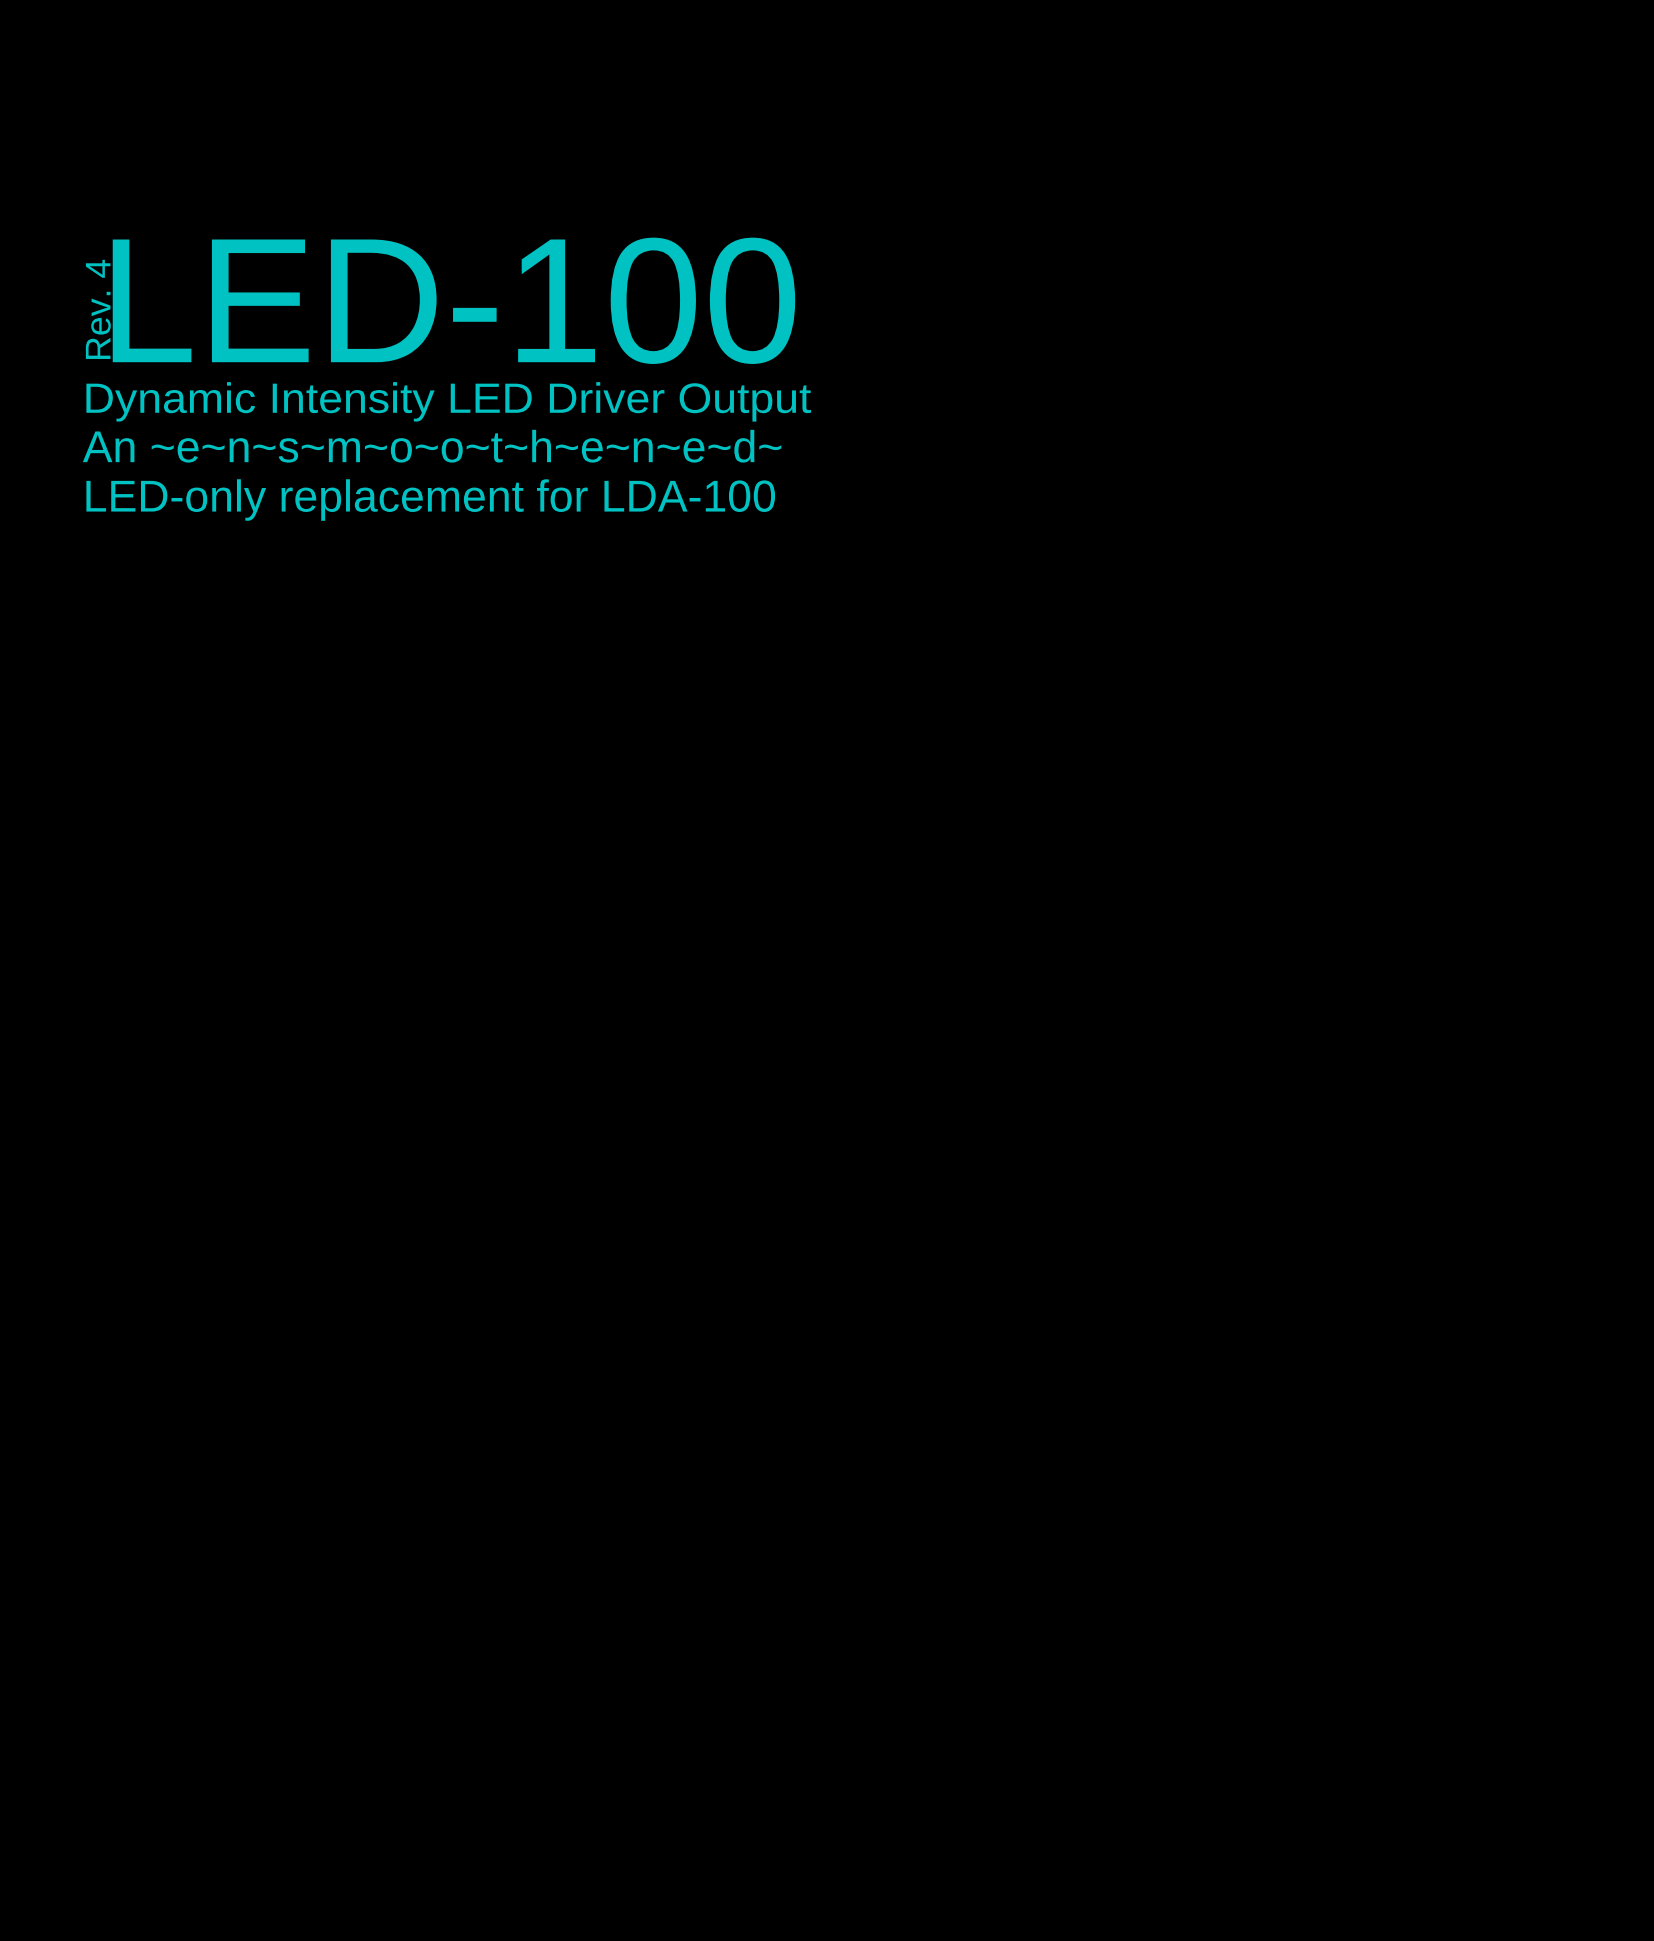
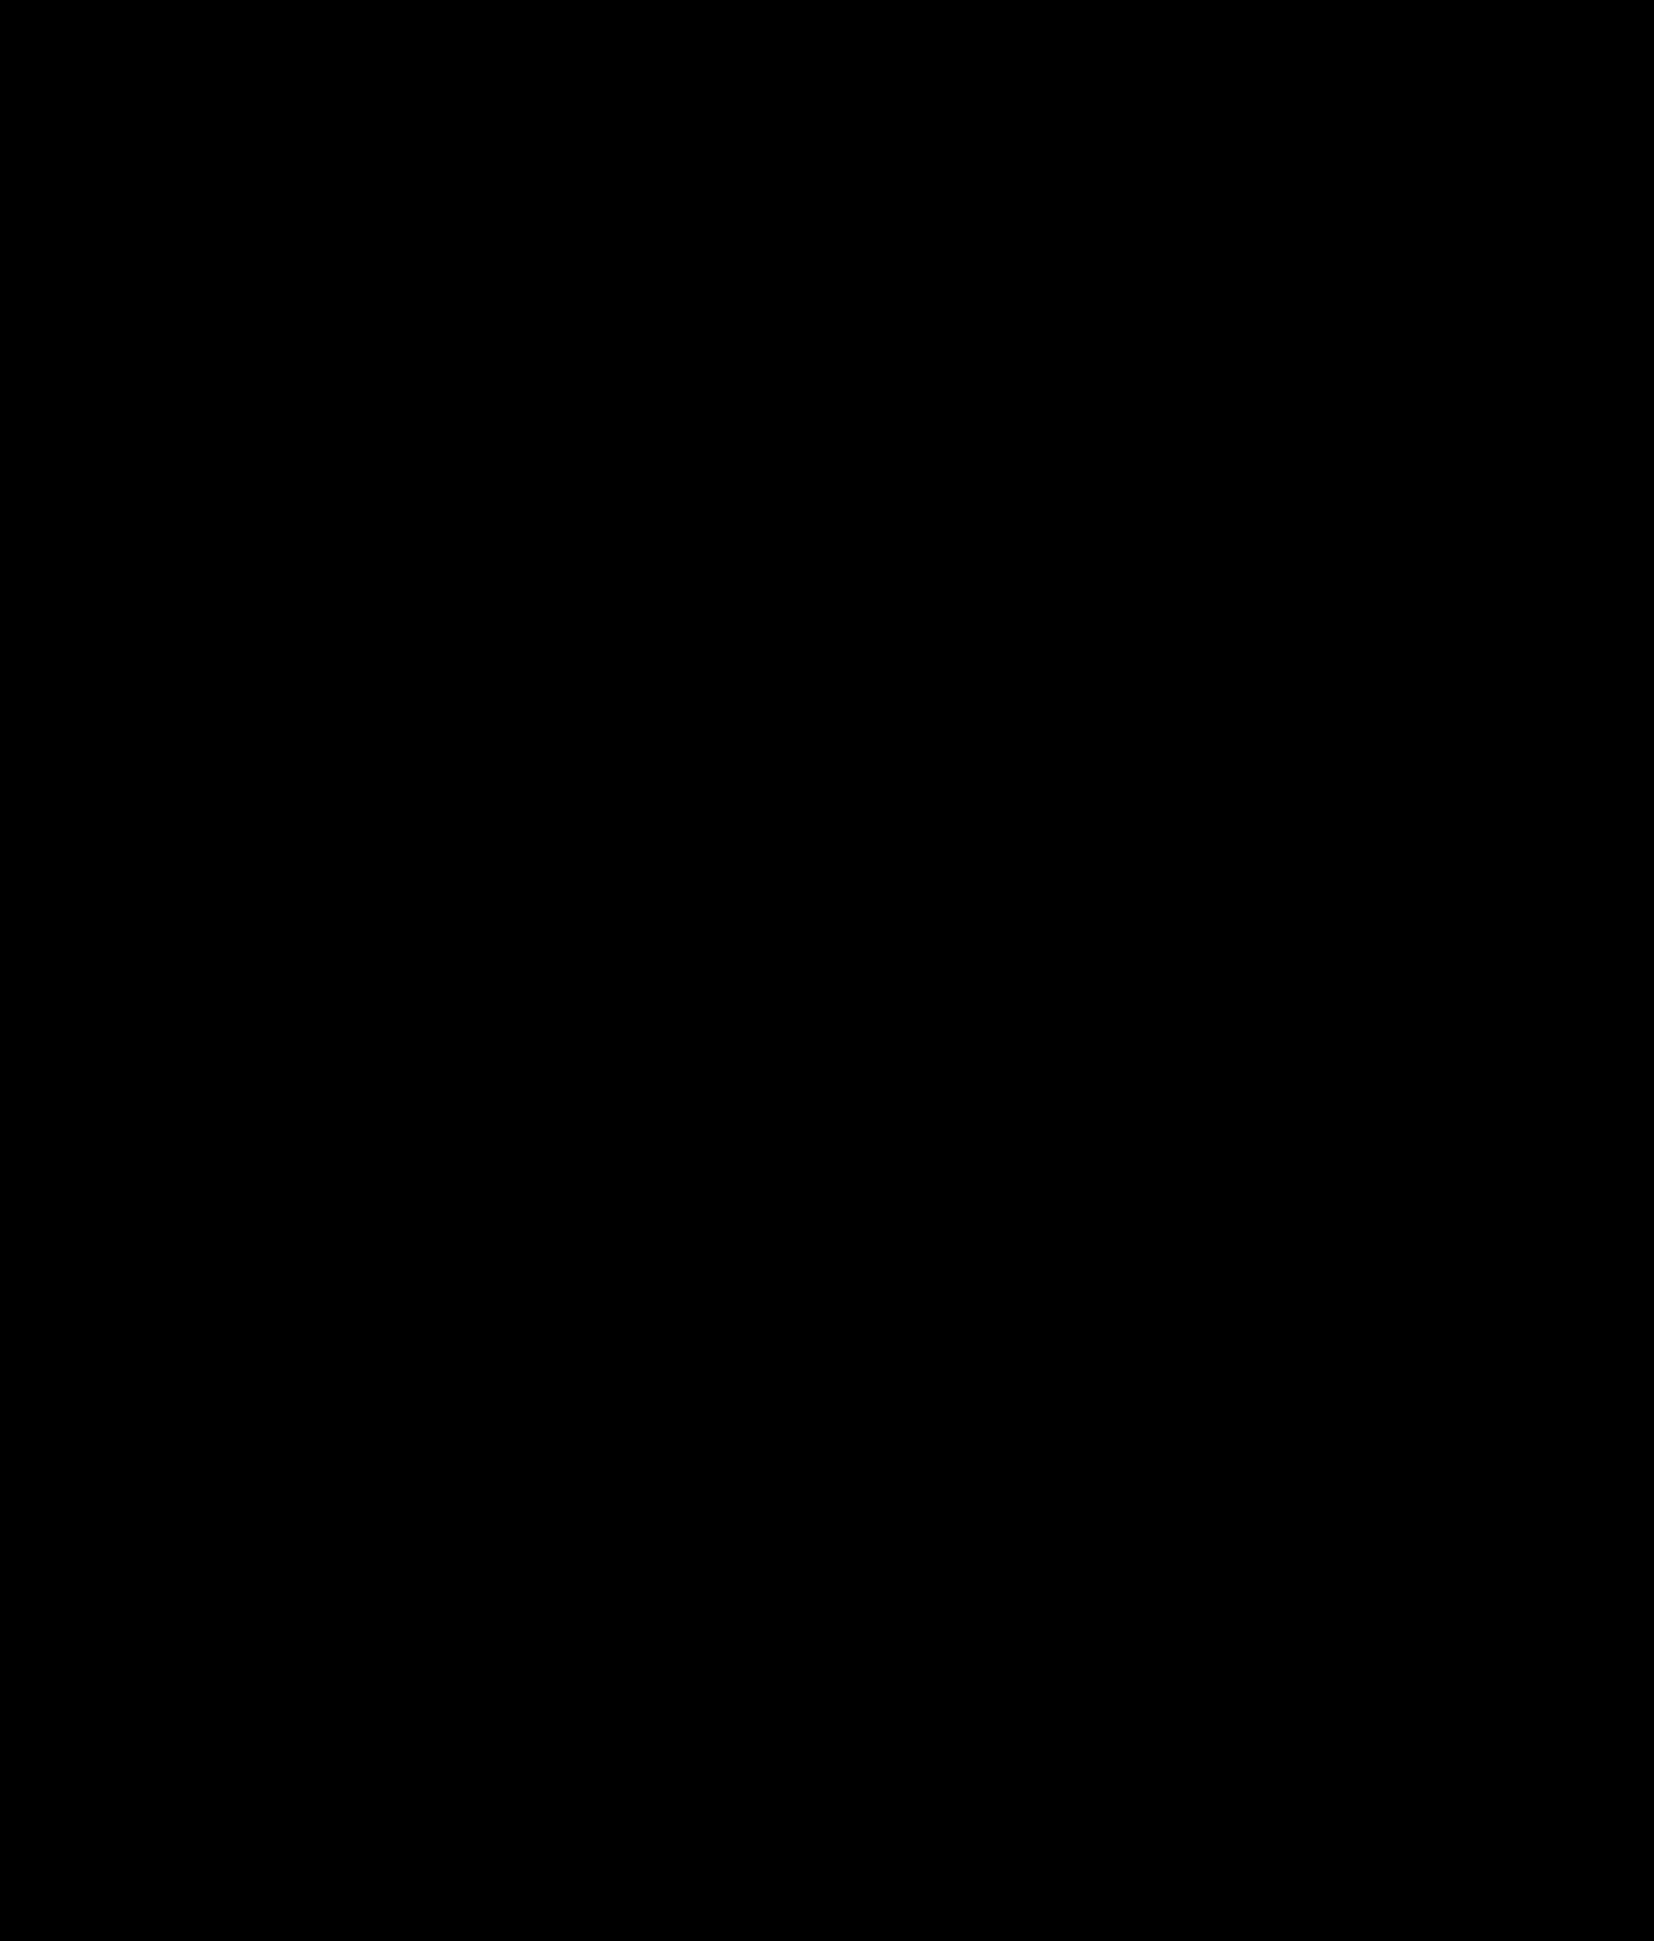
text: LED-100 (453, 300) -> none
text: Rev. 4 (98, 309) -> none
text: Dynamic Intensity LED Driver Output (448, 401) -> none
text: An ~e~n~s~m~o~o~t~h~e~n~e~d~ (432, 446) -> none
text: LED-only replacement for LDA-100 (430, 500) -> none

